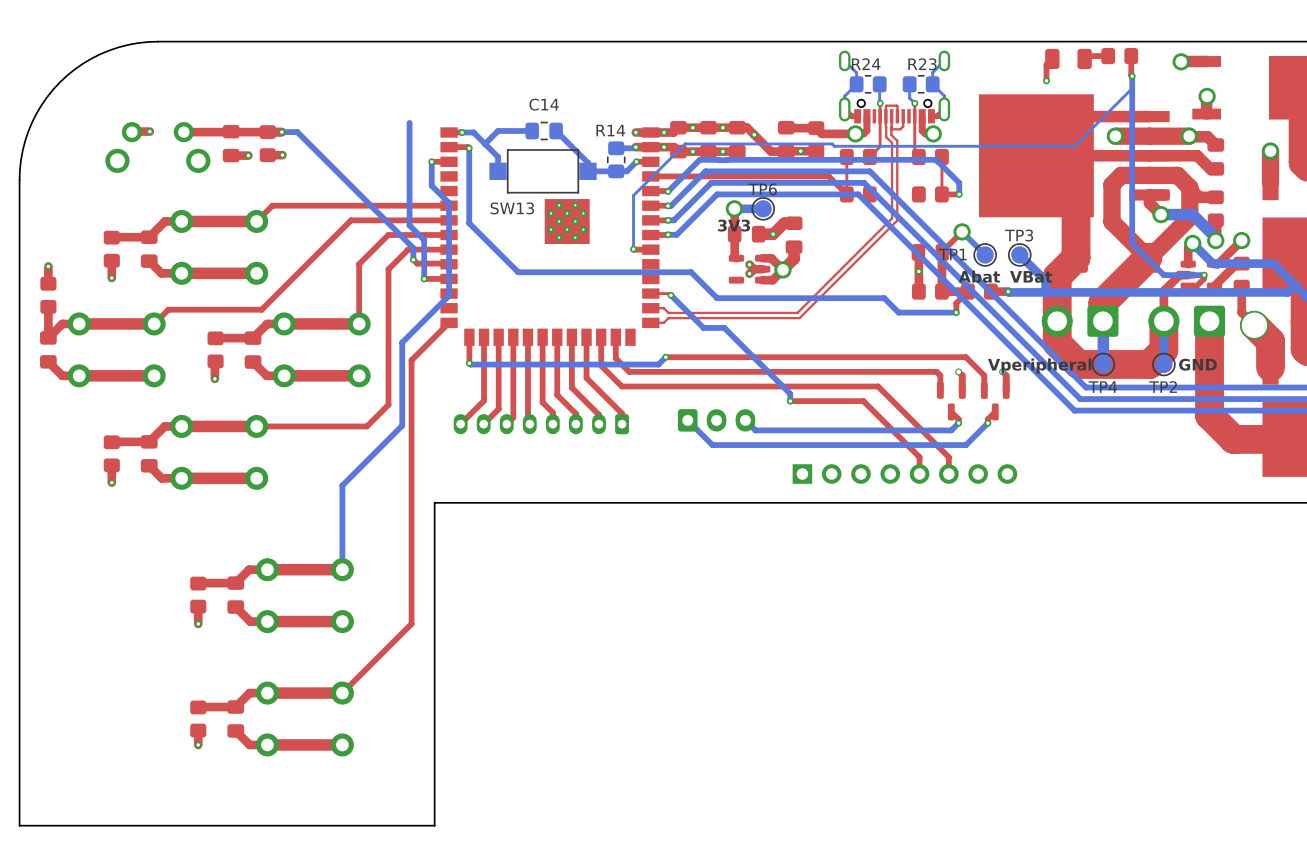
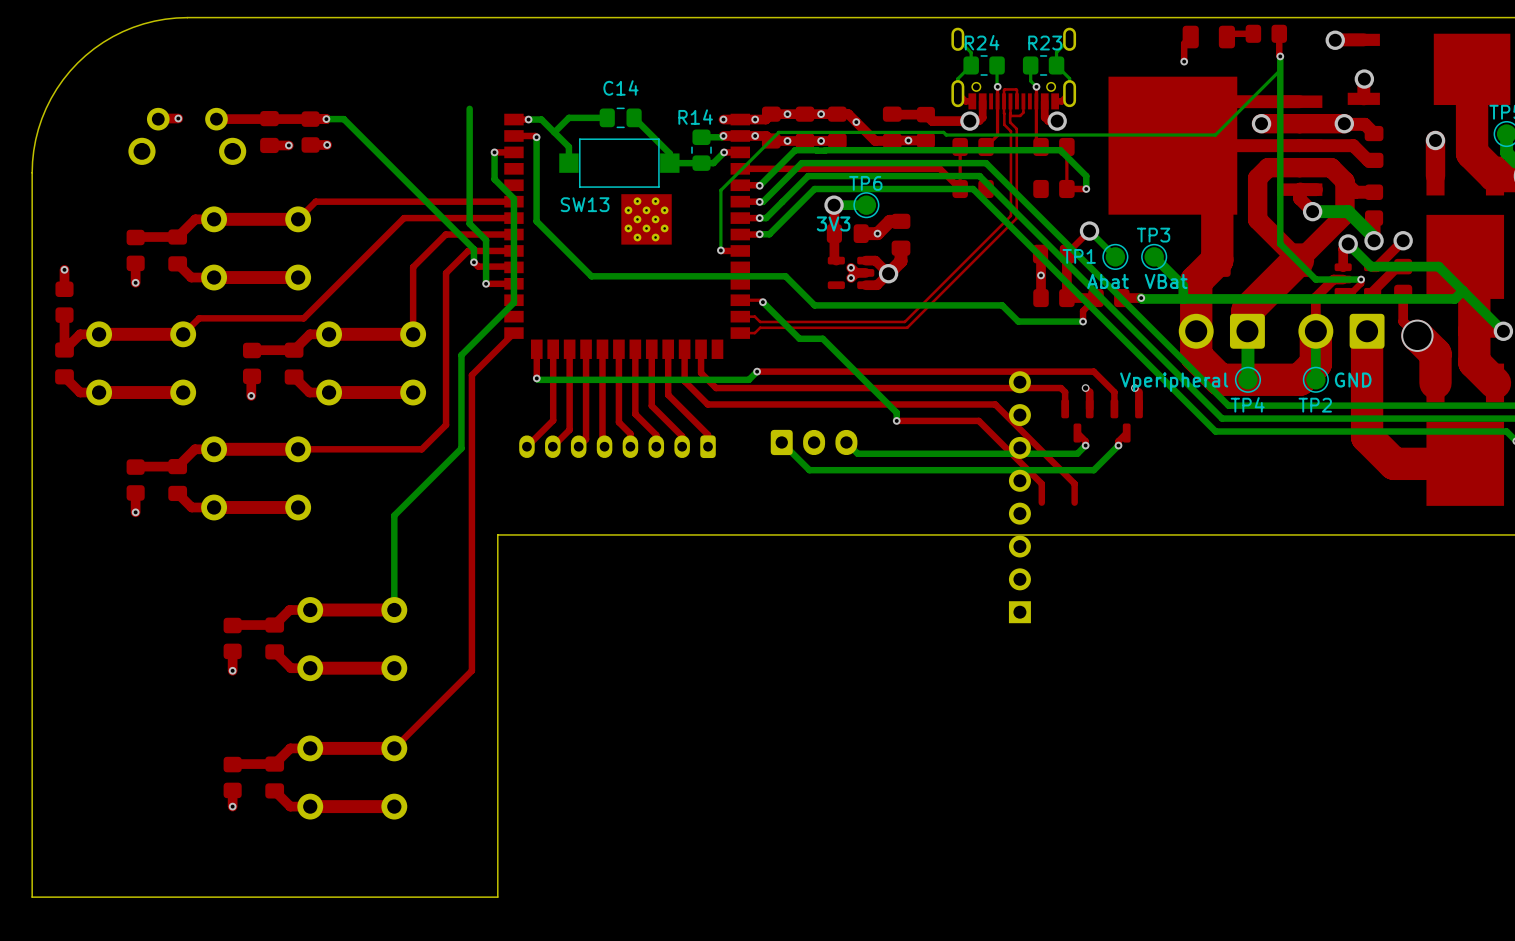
part rotation: 0° (904, 474) -> 90° counterclockwise (1019, 497)

